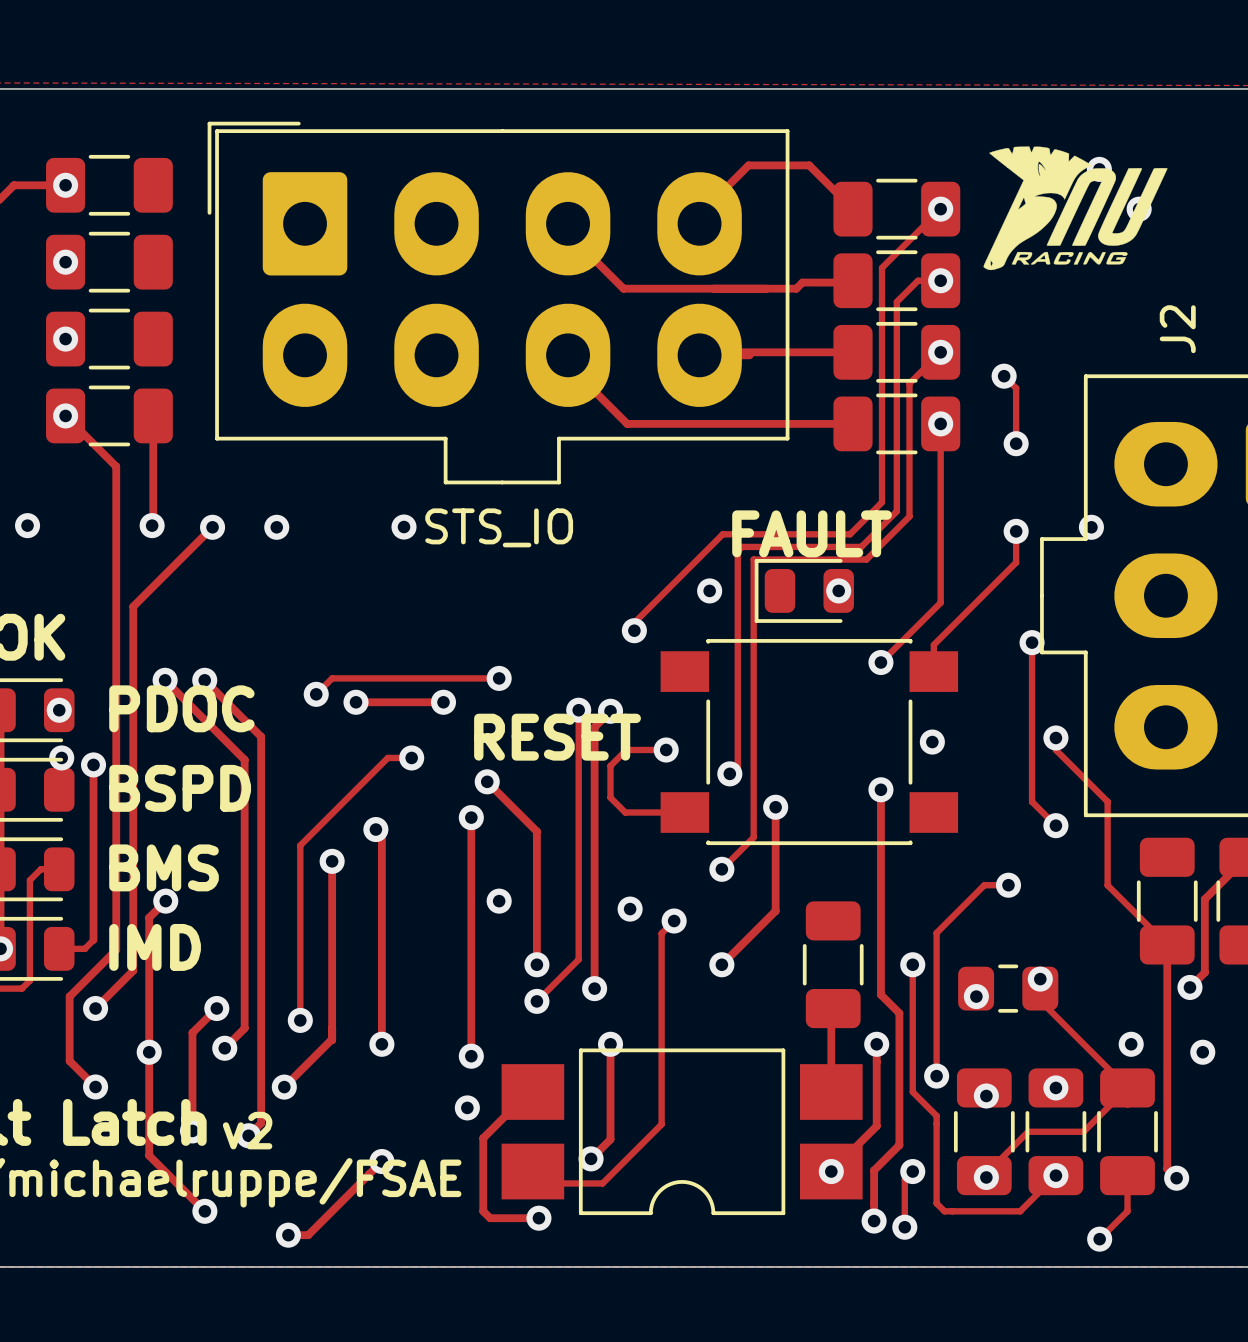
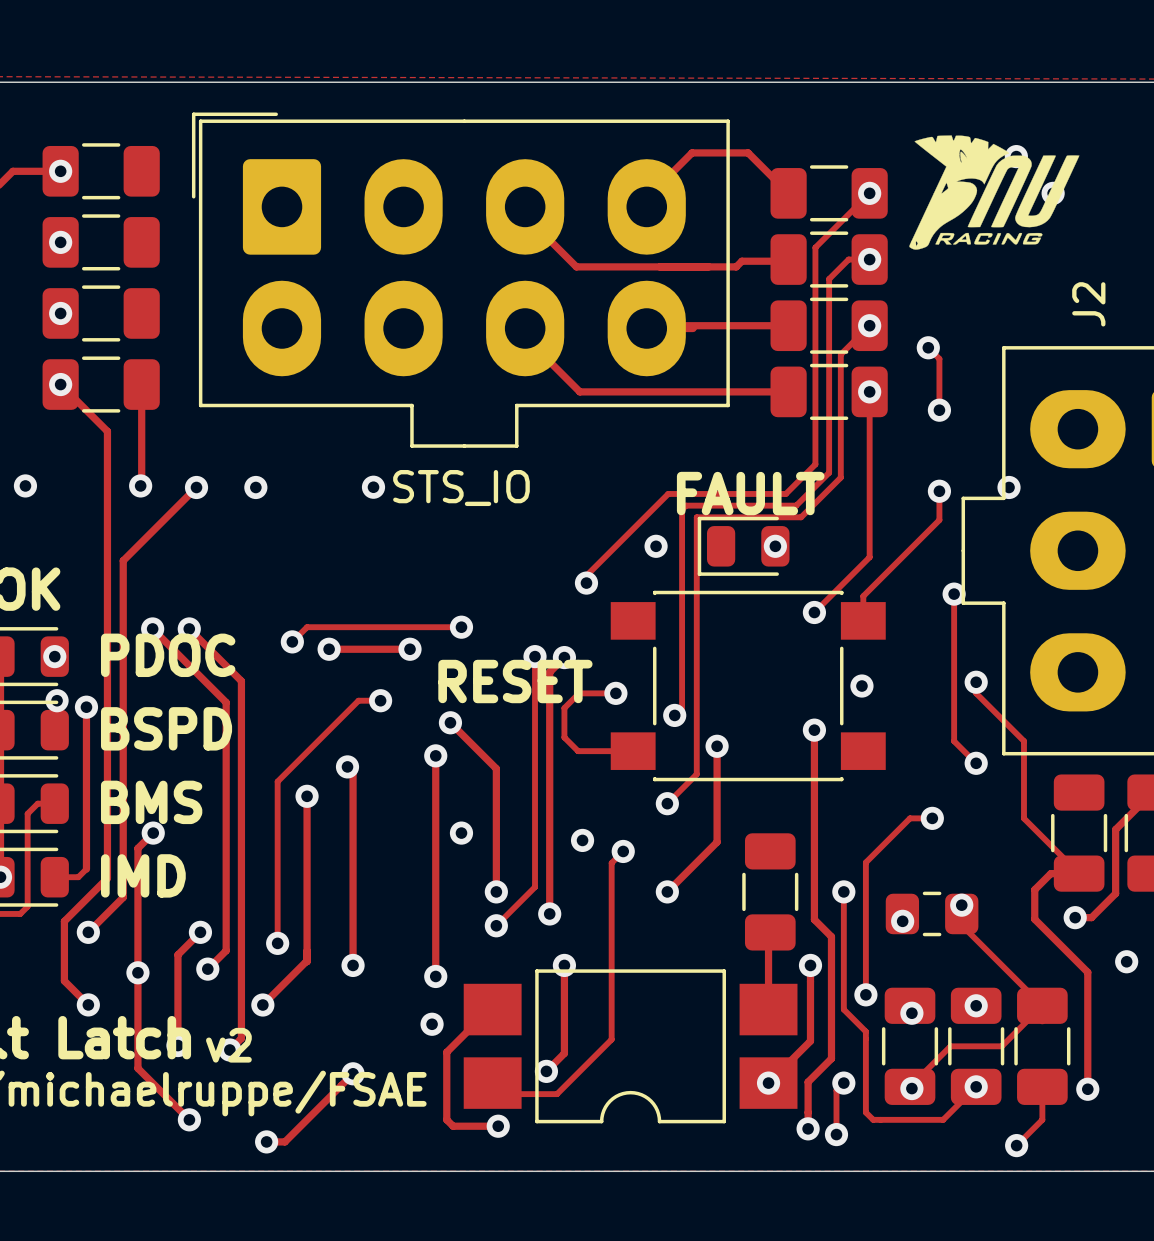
track: (1206, 897) (1204, 899) (1204, 972) (1189, 987) -> (1115, 829) (1115, 893) (1091, 917) (1075, 917)
track: (1167, 944) (1167, 1168) (1176, 1178) -> (1079, 873) (1050, 873) (1034, 889) (1034, 919) (1087, 972) (1087, 1089)
via position: (1189, 987) -> (1075, 917)
via: (1131, 1044) -> none
via position: (1202, 1052) -> (1126, 961)

